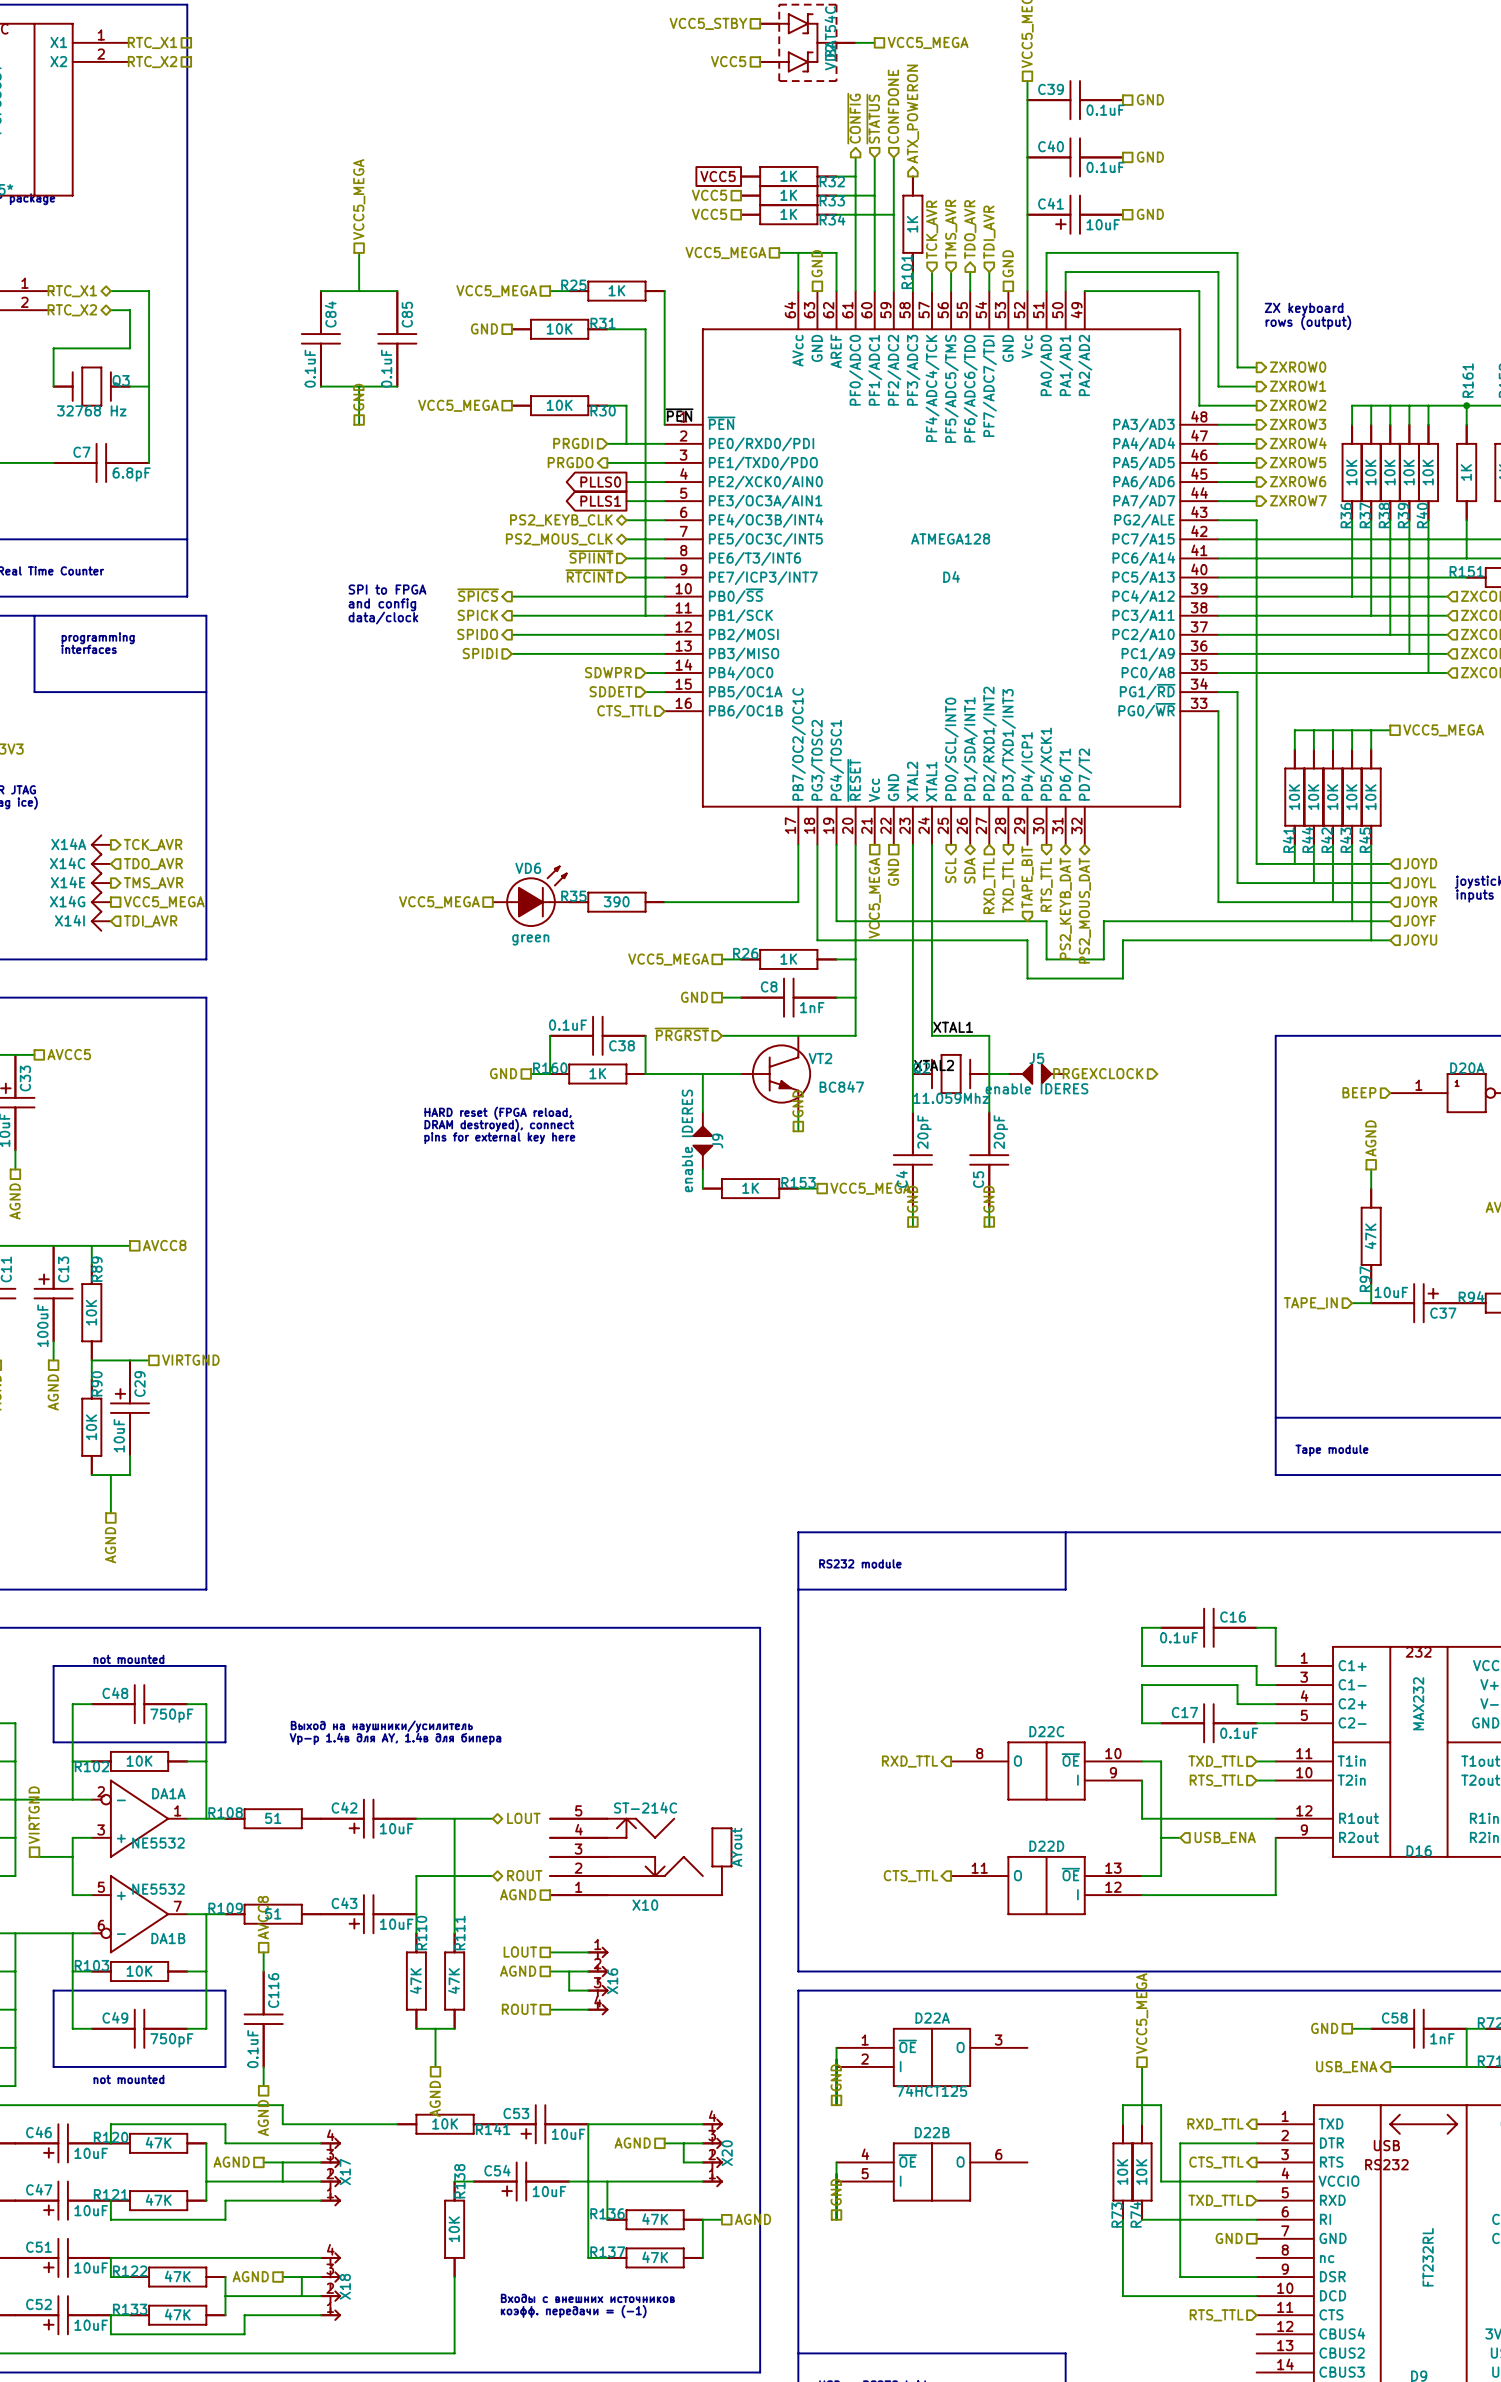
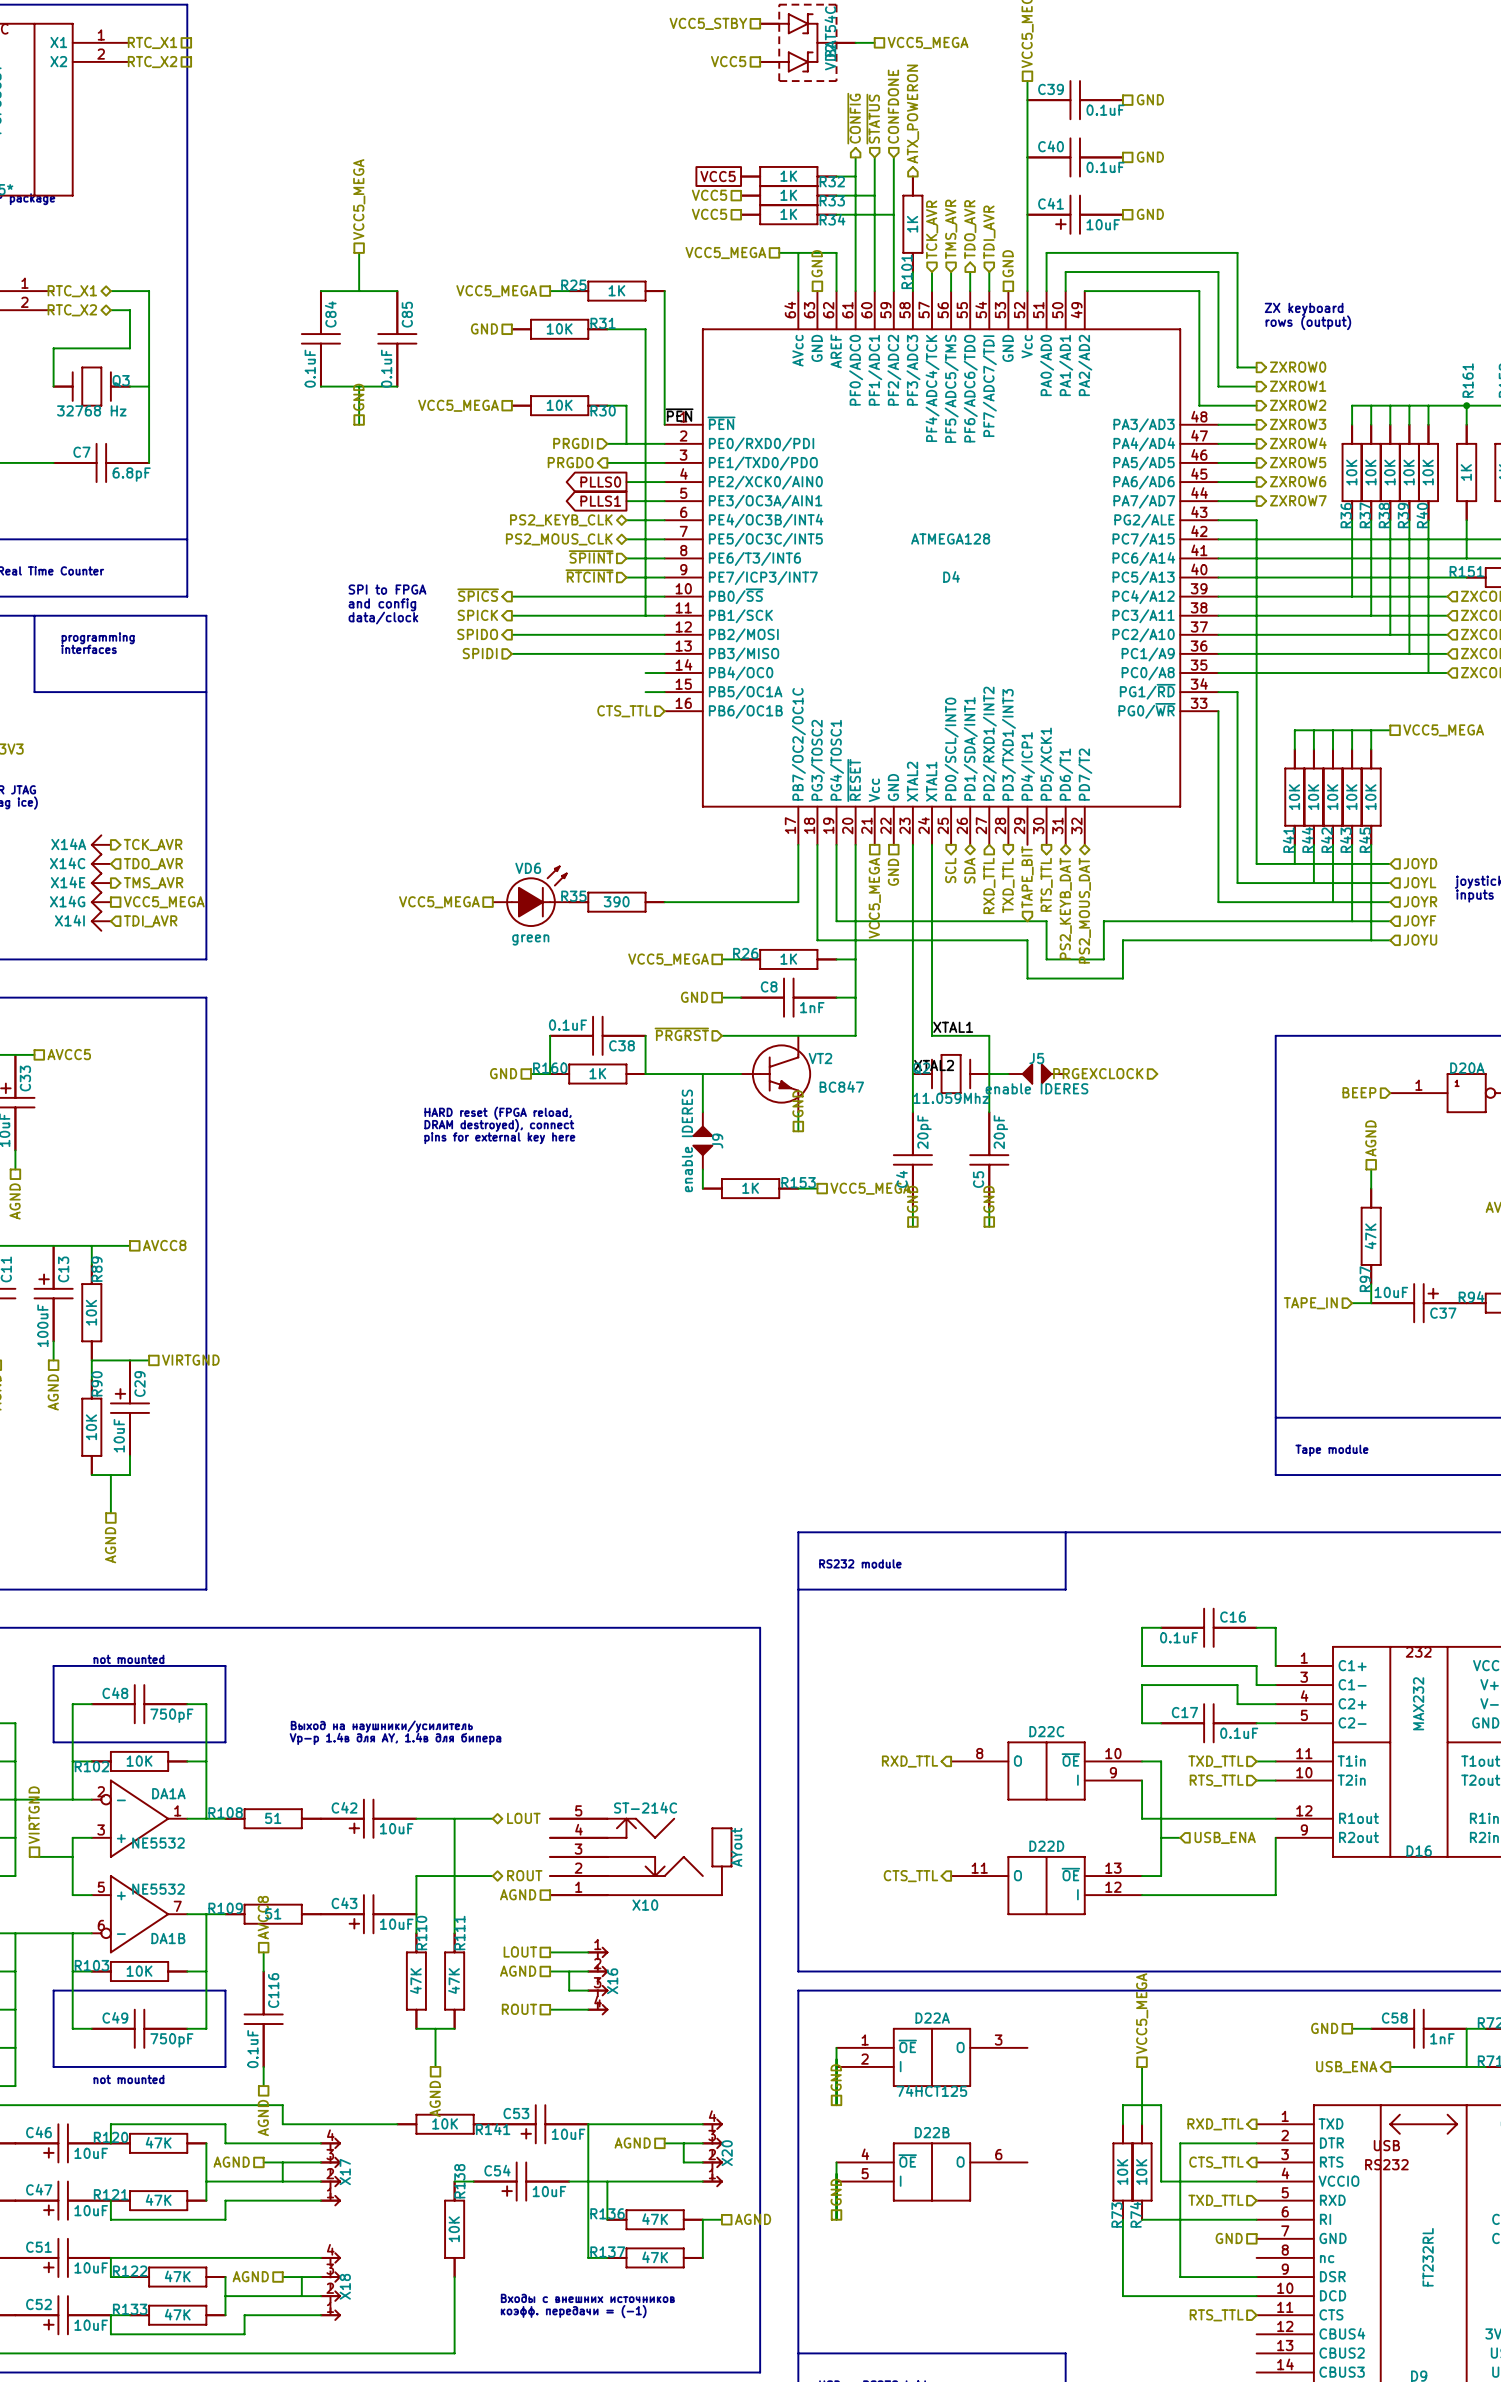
hierarchical label: SDWPR (608, 672) -> none
hierarchical label: SDDET (611, 691) -> none

